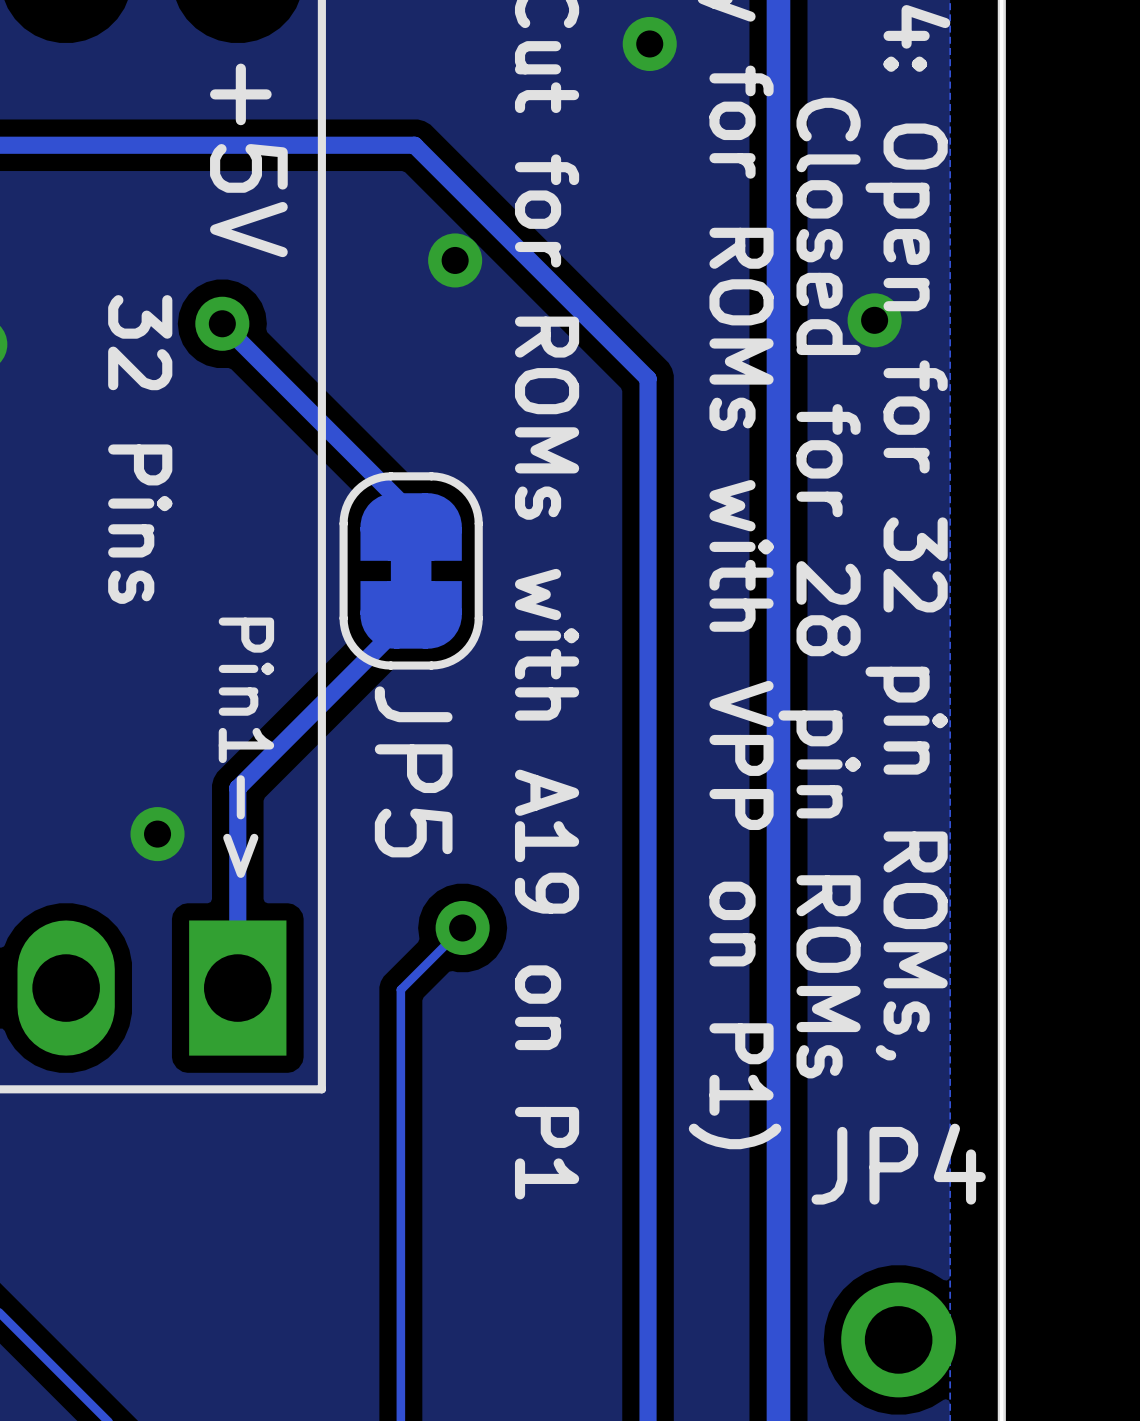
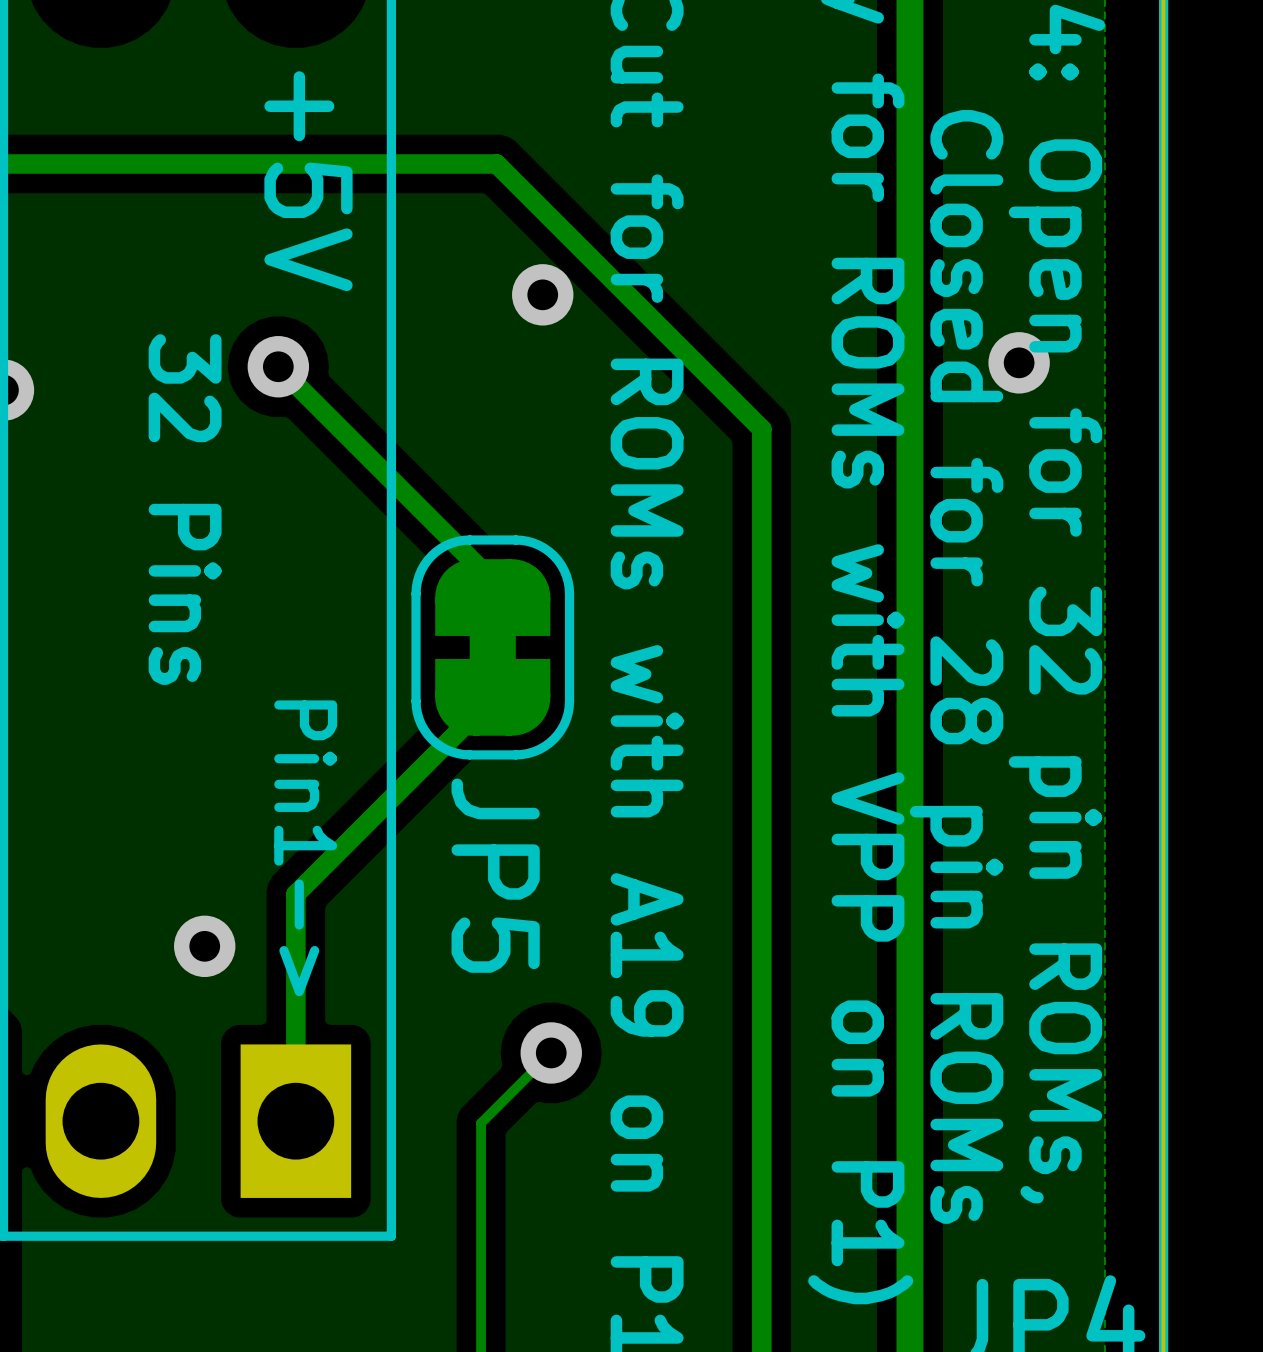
via: (649, 43) -> none

